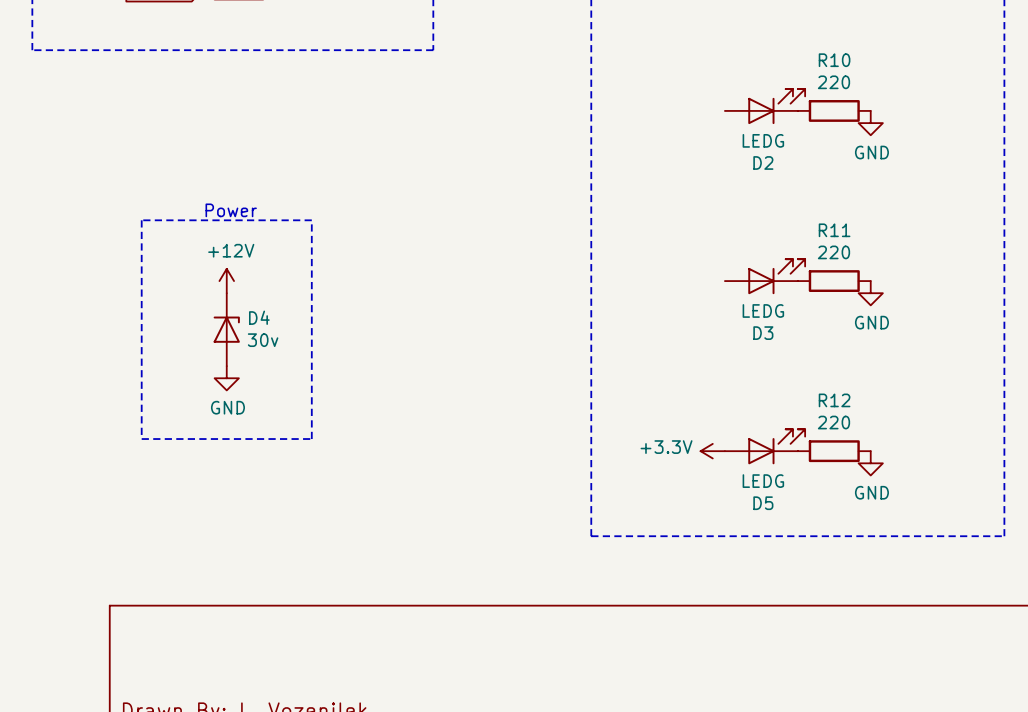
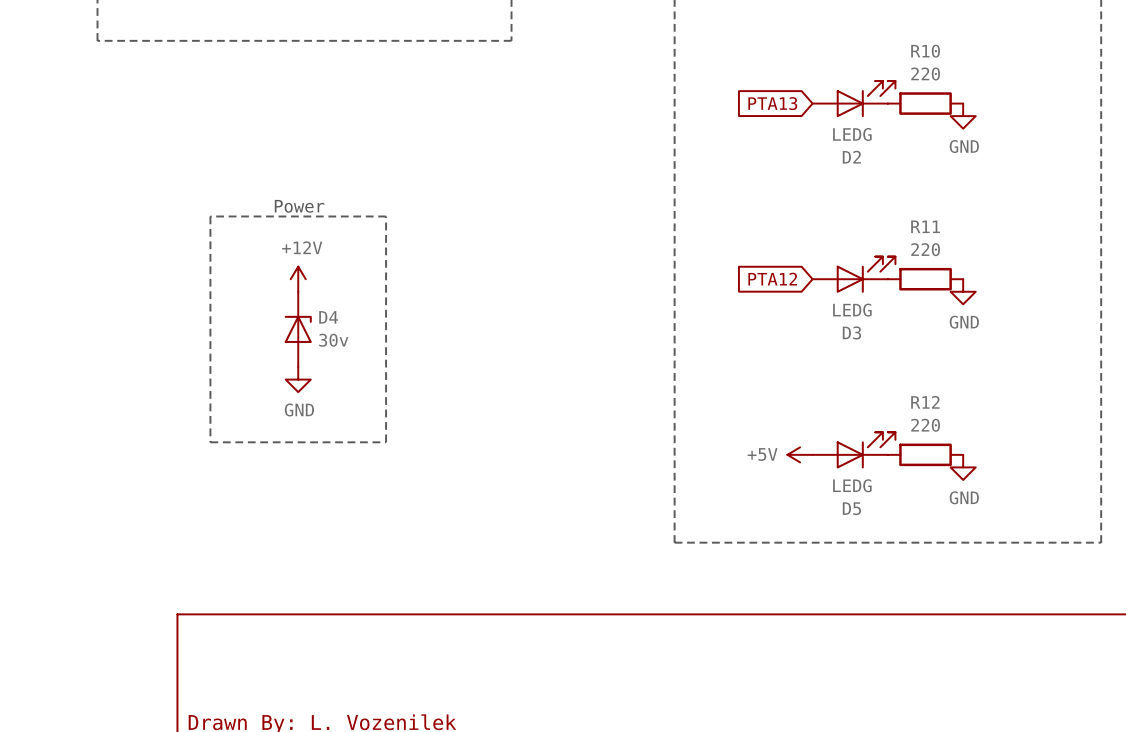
global label: none -> PTA13 (772, 103)
global label: none -> PTA12 (772, 279)
power symbol: +3.3V (712, 451) -> +5V (800, 454)

